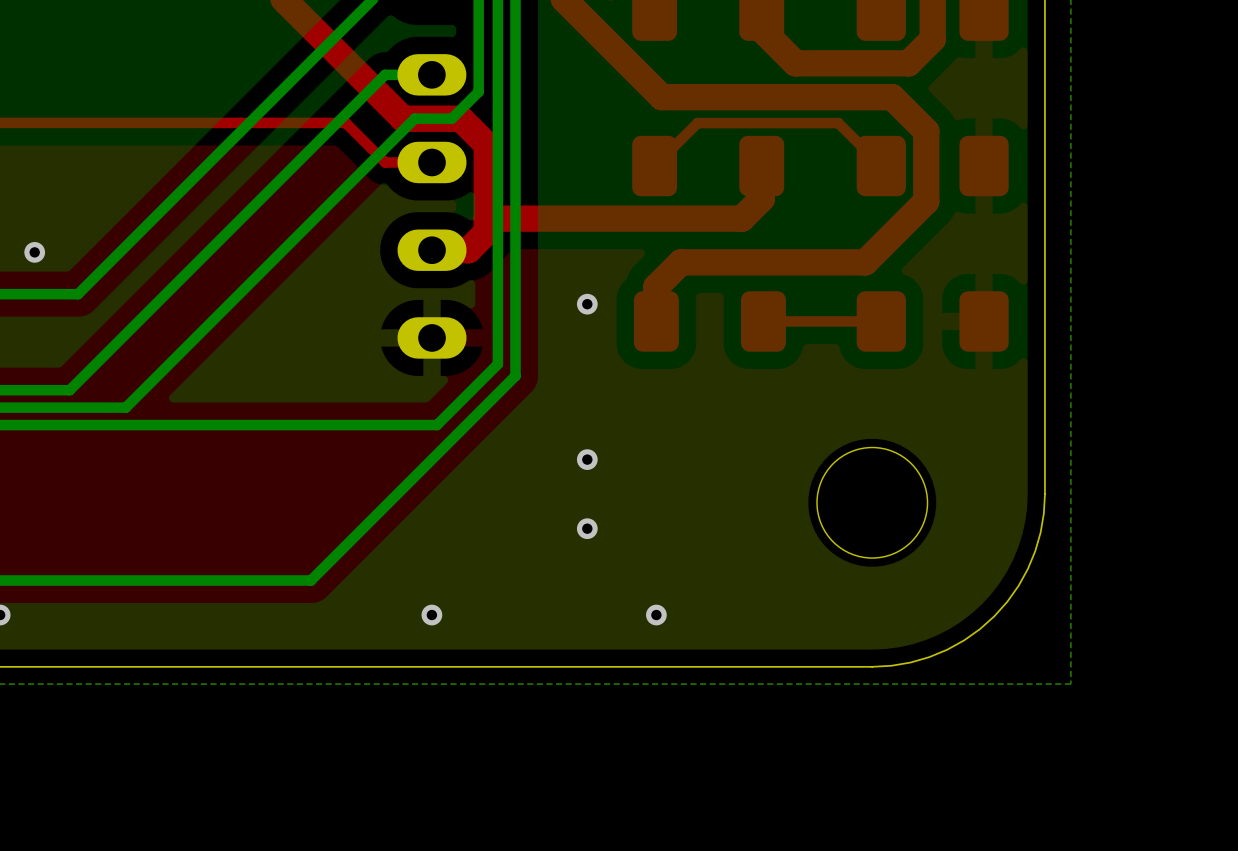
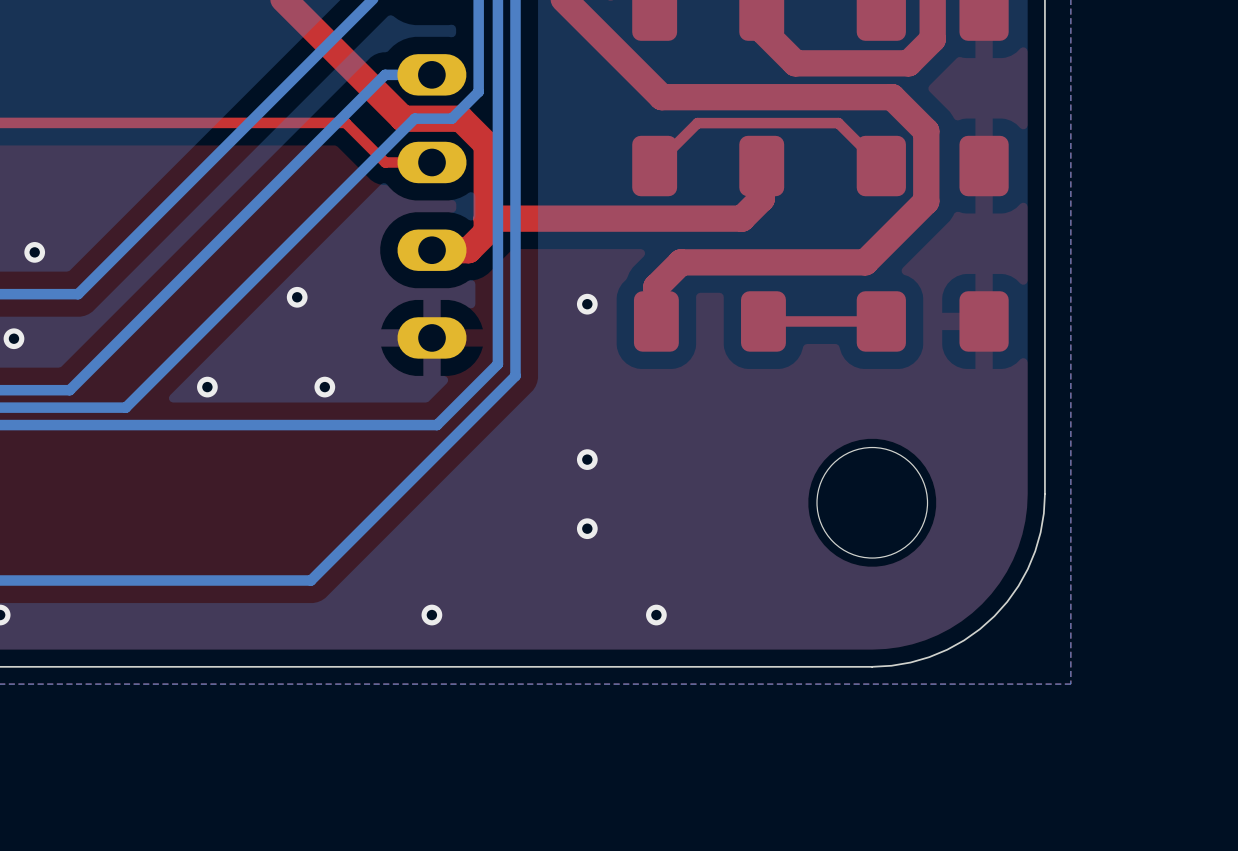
via: none -> (297, 297)
via: none -> (13, 338)
via: none -> (207, 387)
via: none -> (324, 387)

